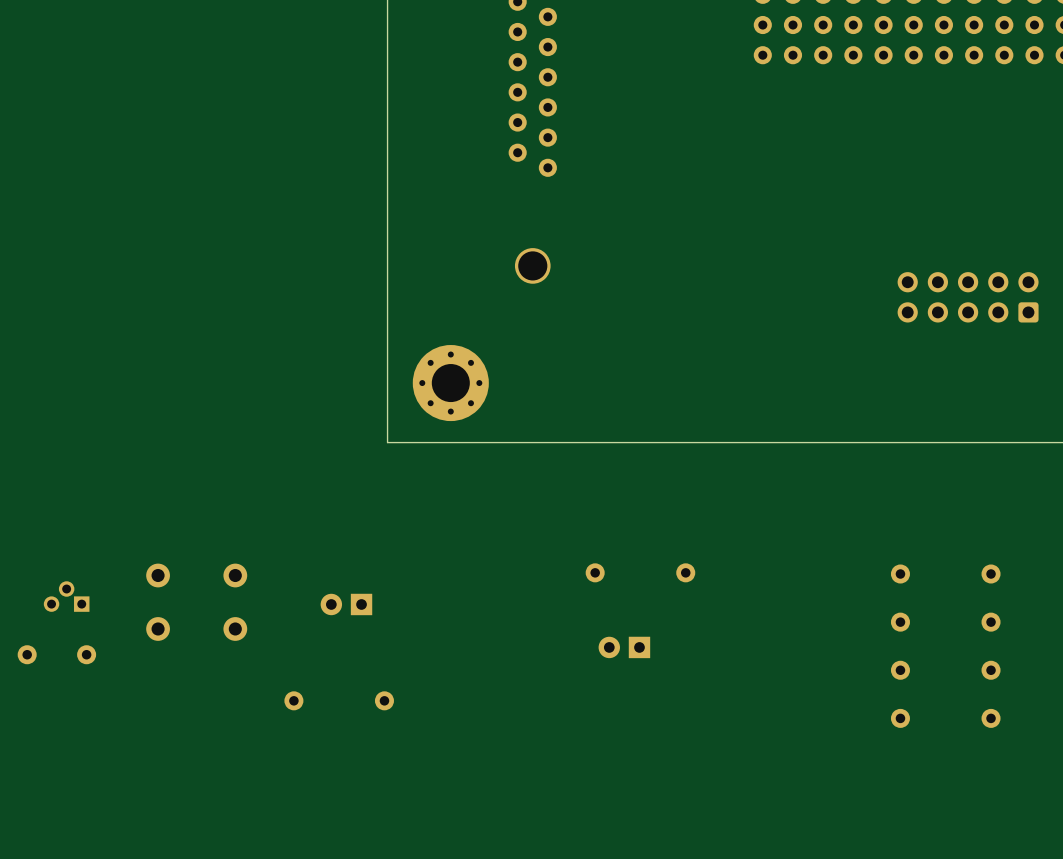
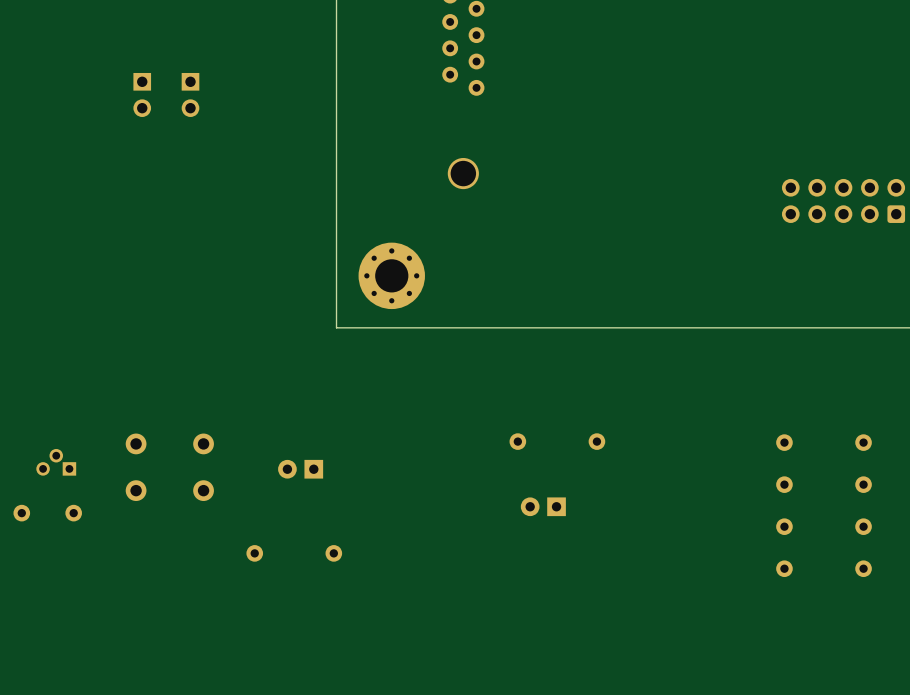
part: none -> (142, 94)
part: none -> (190, 94)

